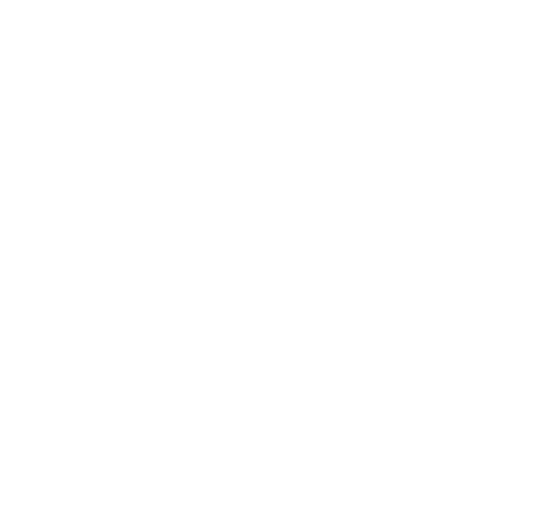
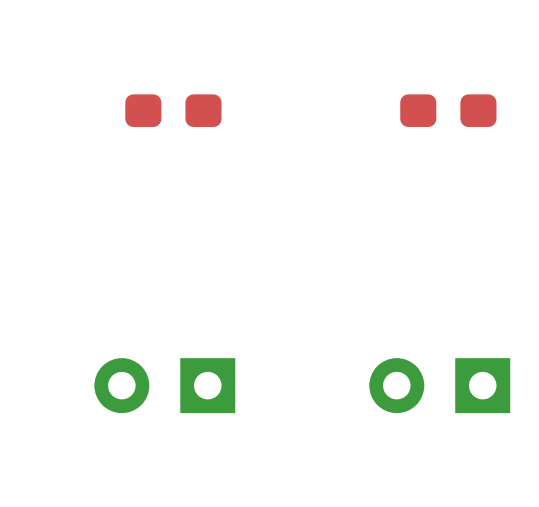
part: none -> (173, 110)
part: none -> (448, 110)
part: none -> (164, 385)
part: none -> (439, 385)

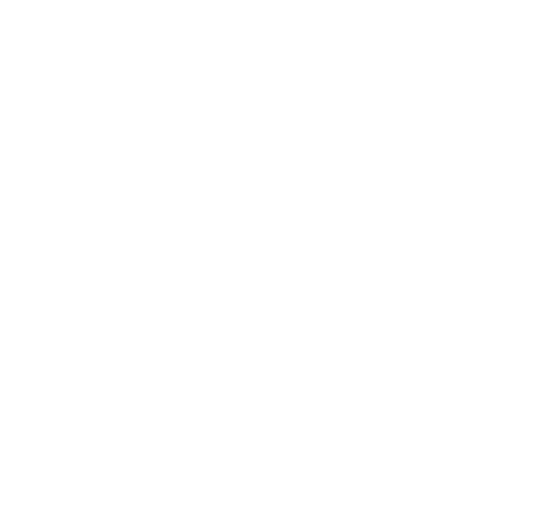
part: (173, 110) -> none
part: (448, 110) -> none
part: (164, 385) -> none
part: (439, 385) -> none

